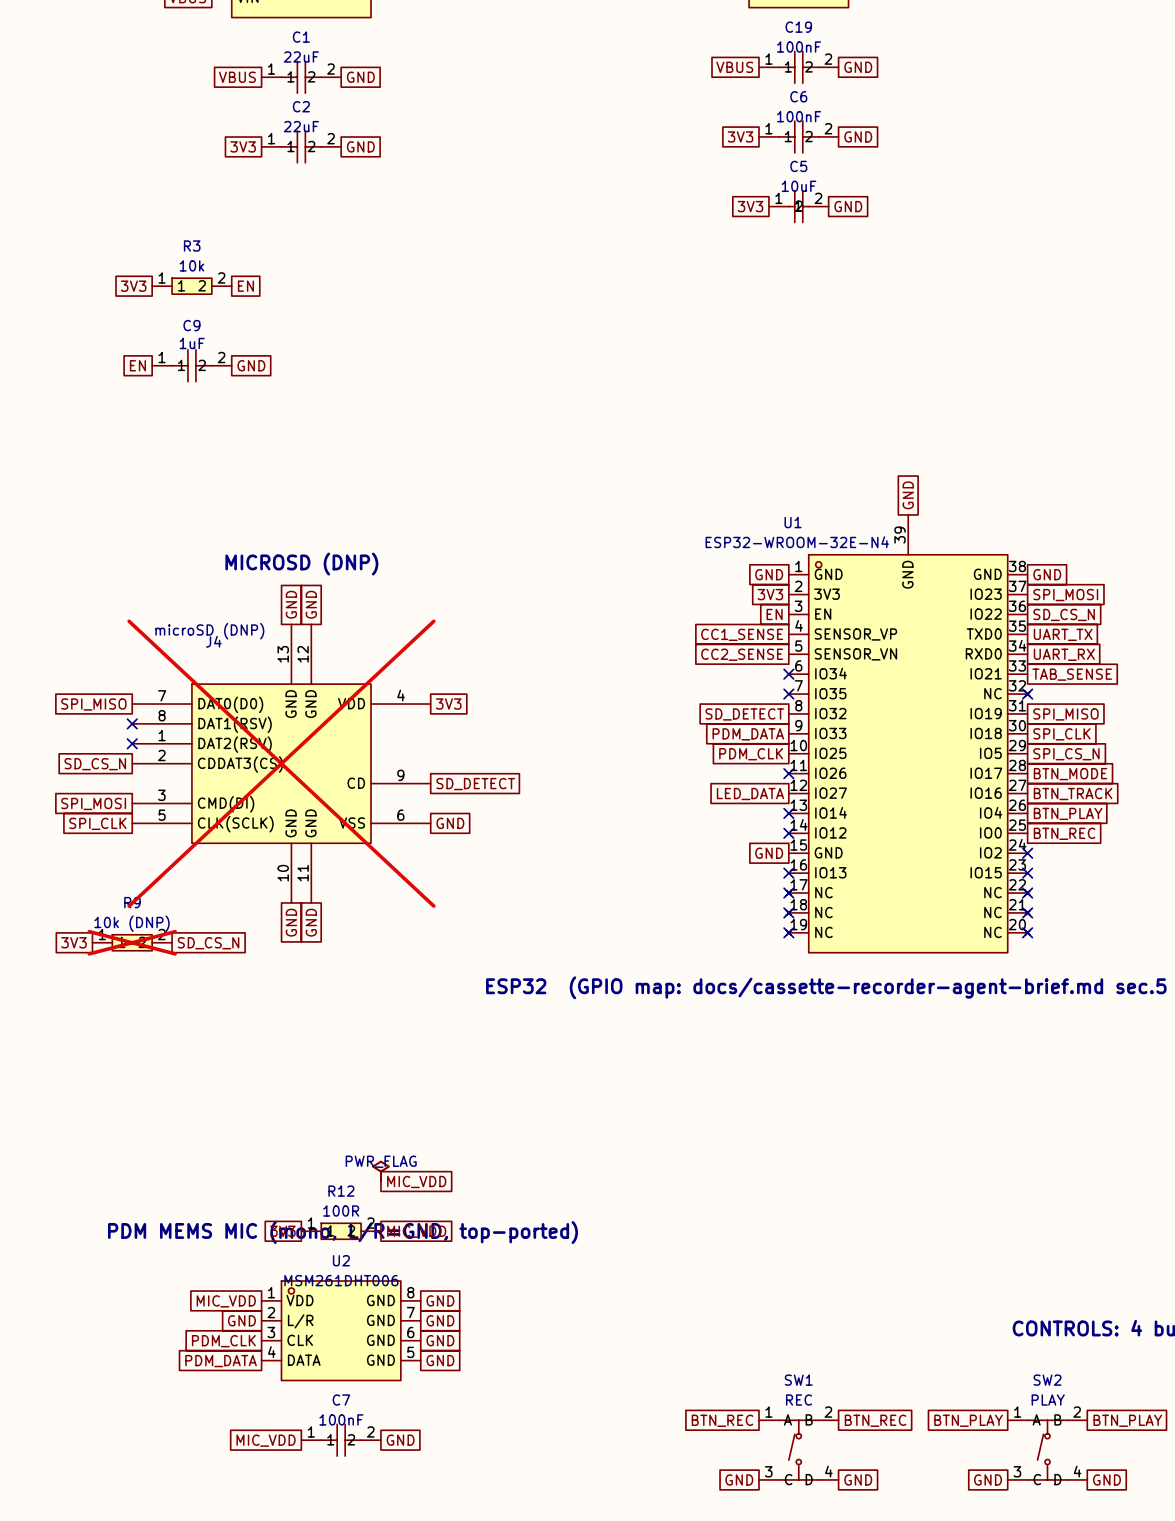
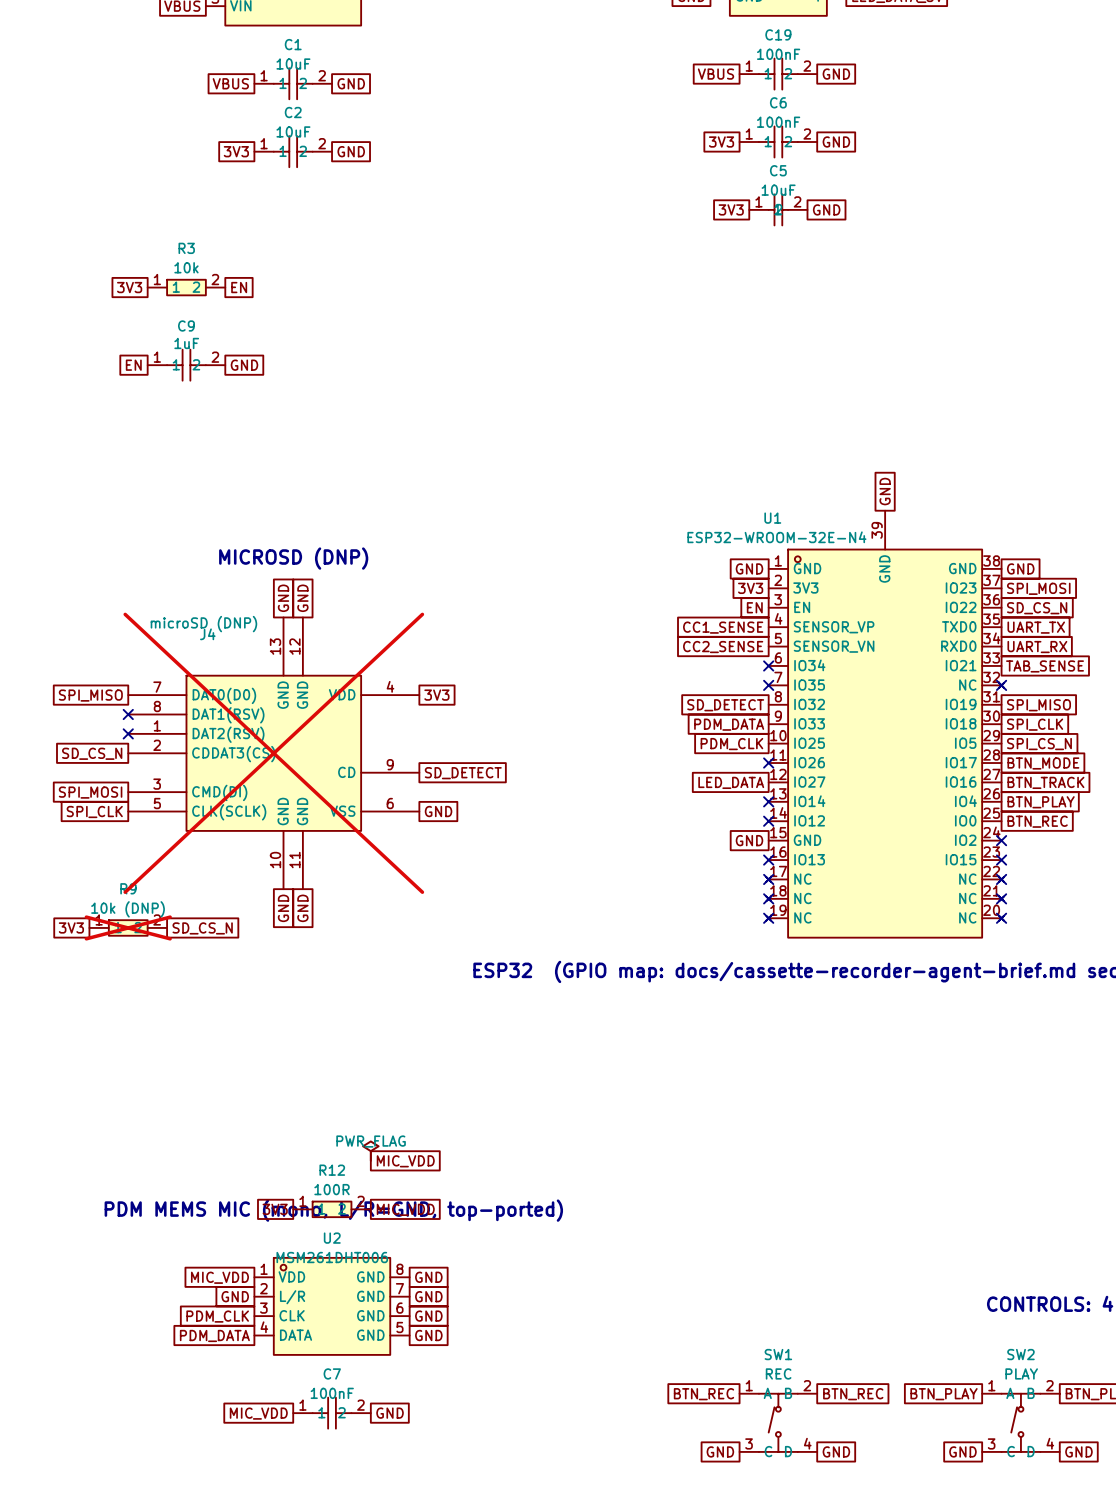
C1 value: 22uF (301, 56) -> 10uF (293, 64)
C2 value: 22uF (301, 126) -> 10uF (293, 131)

